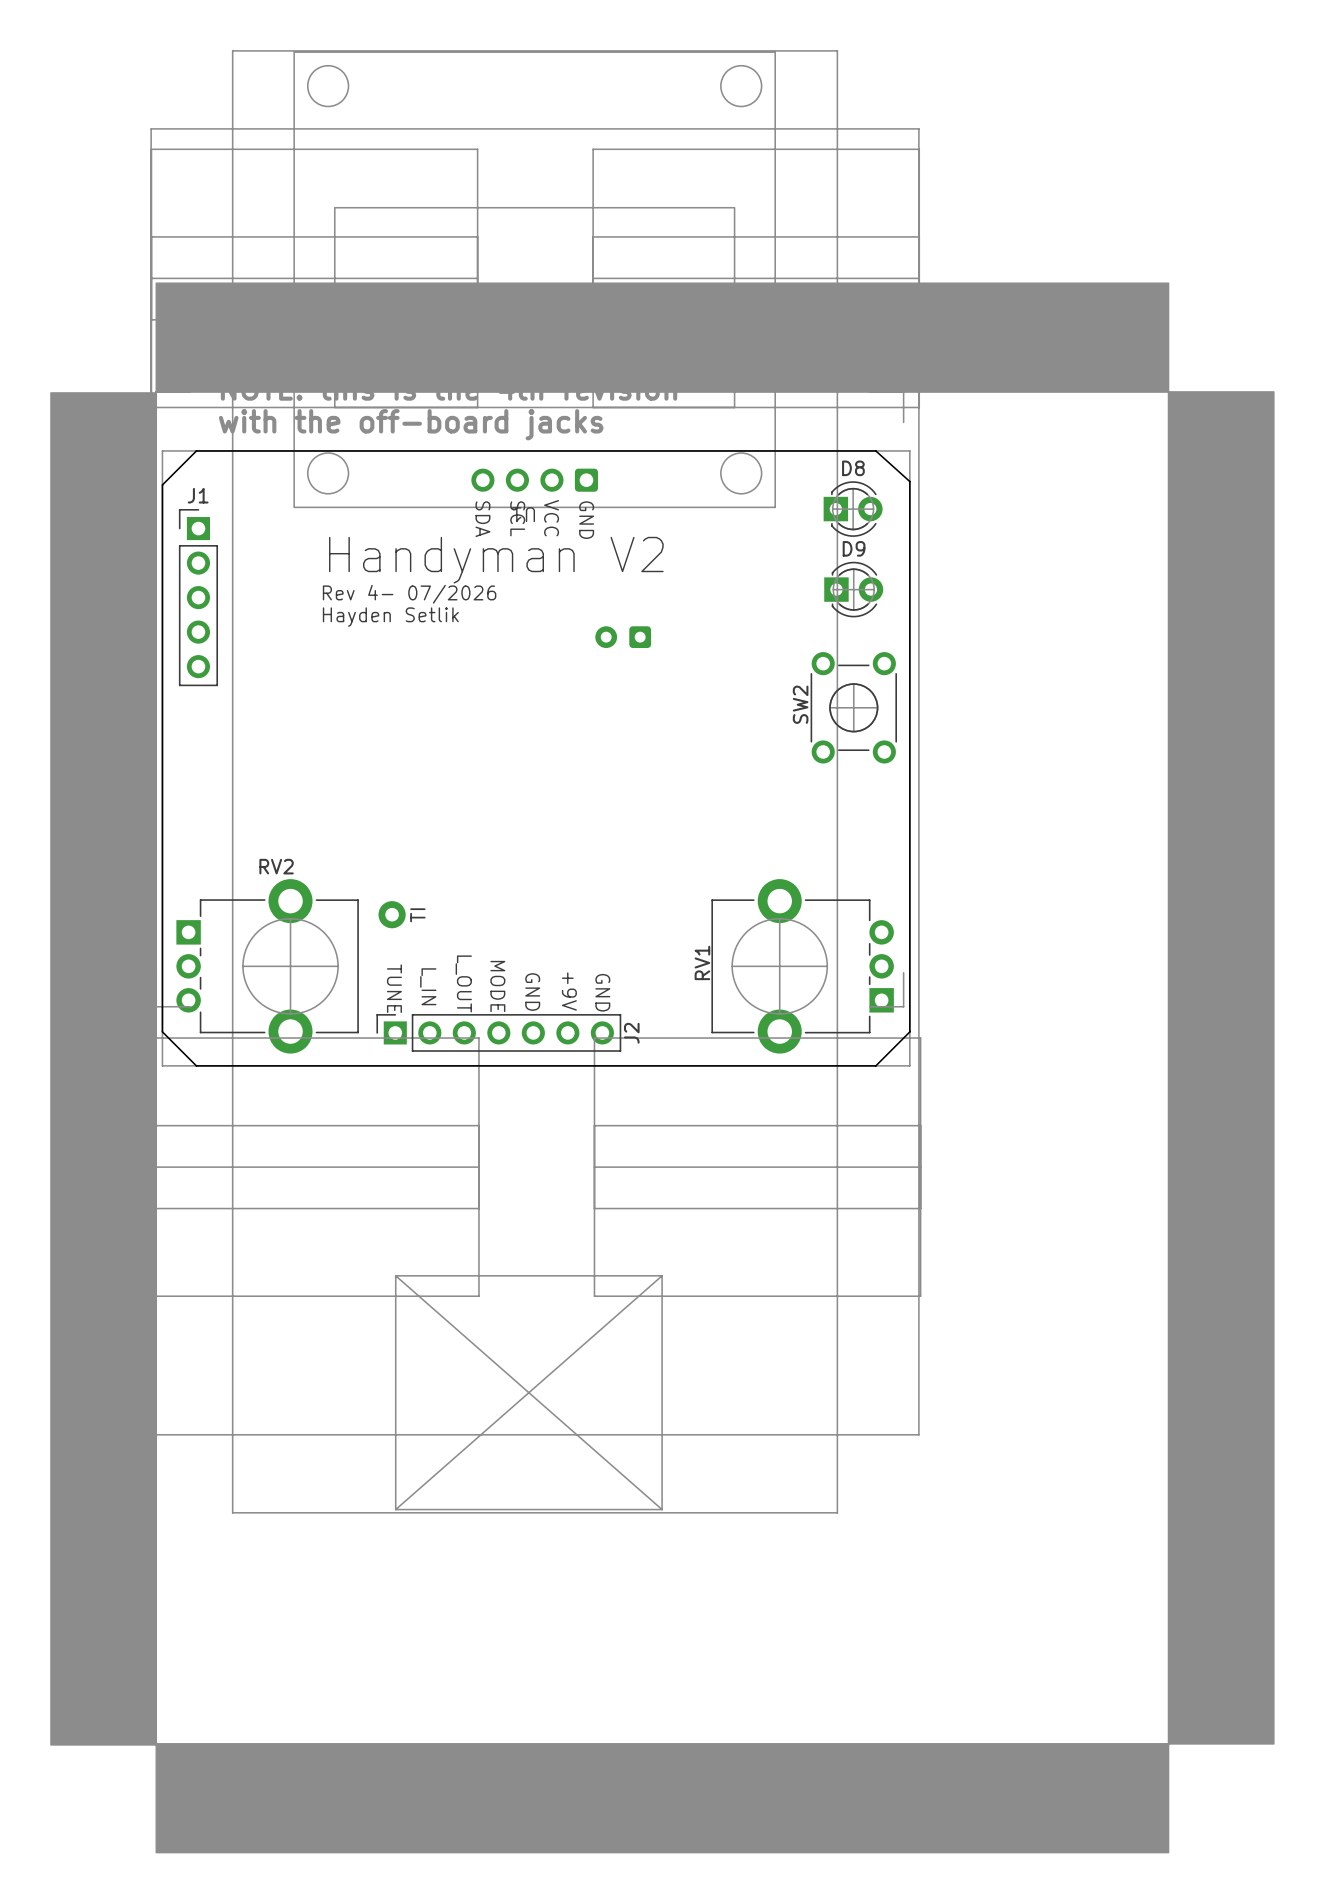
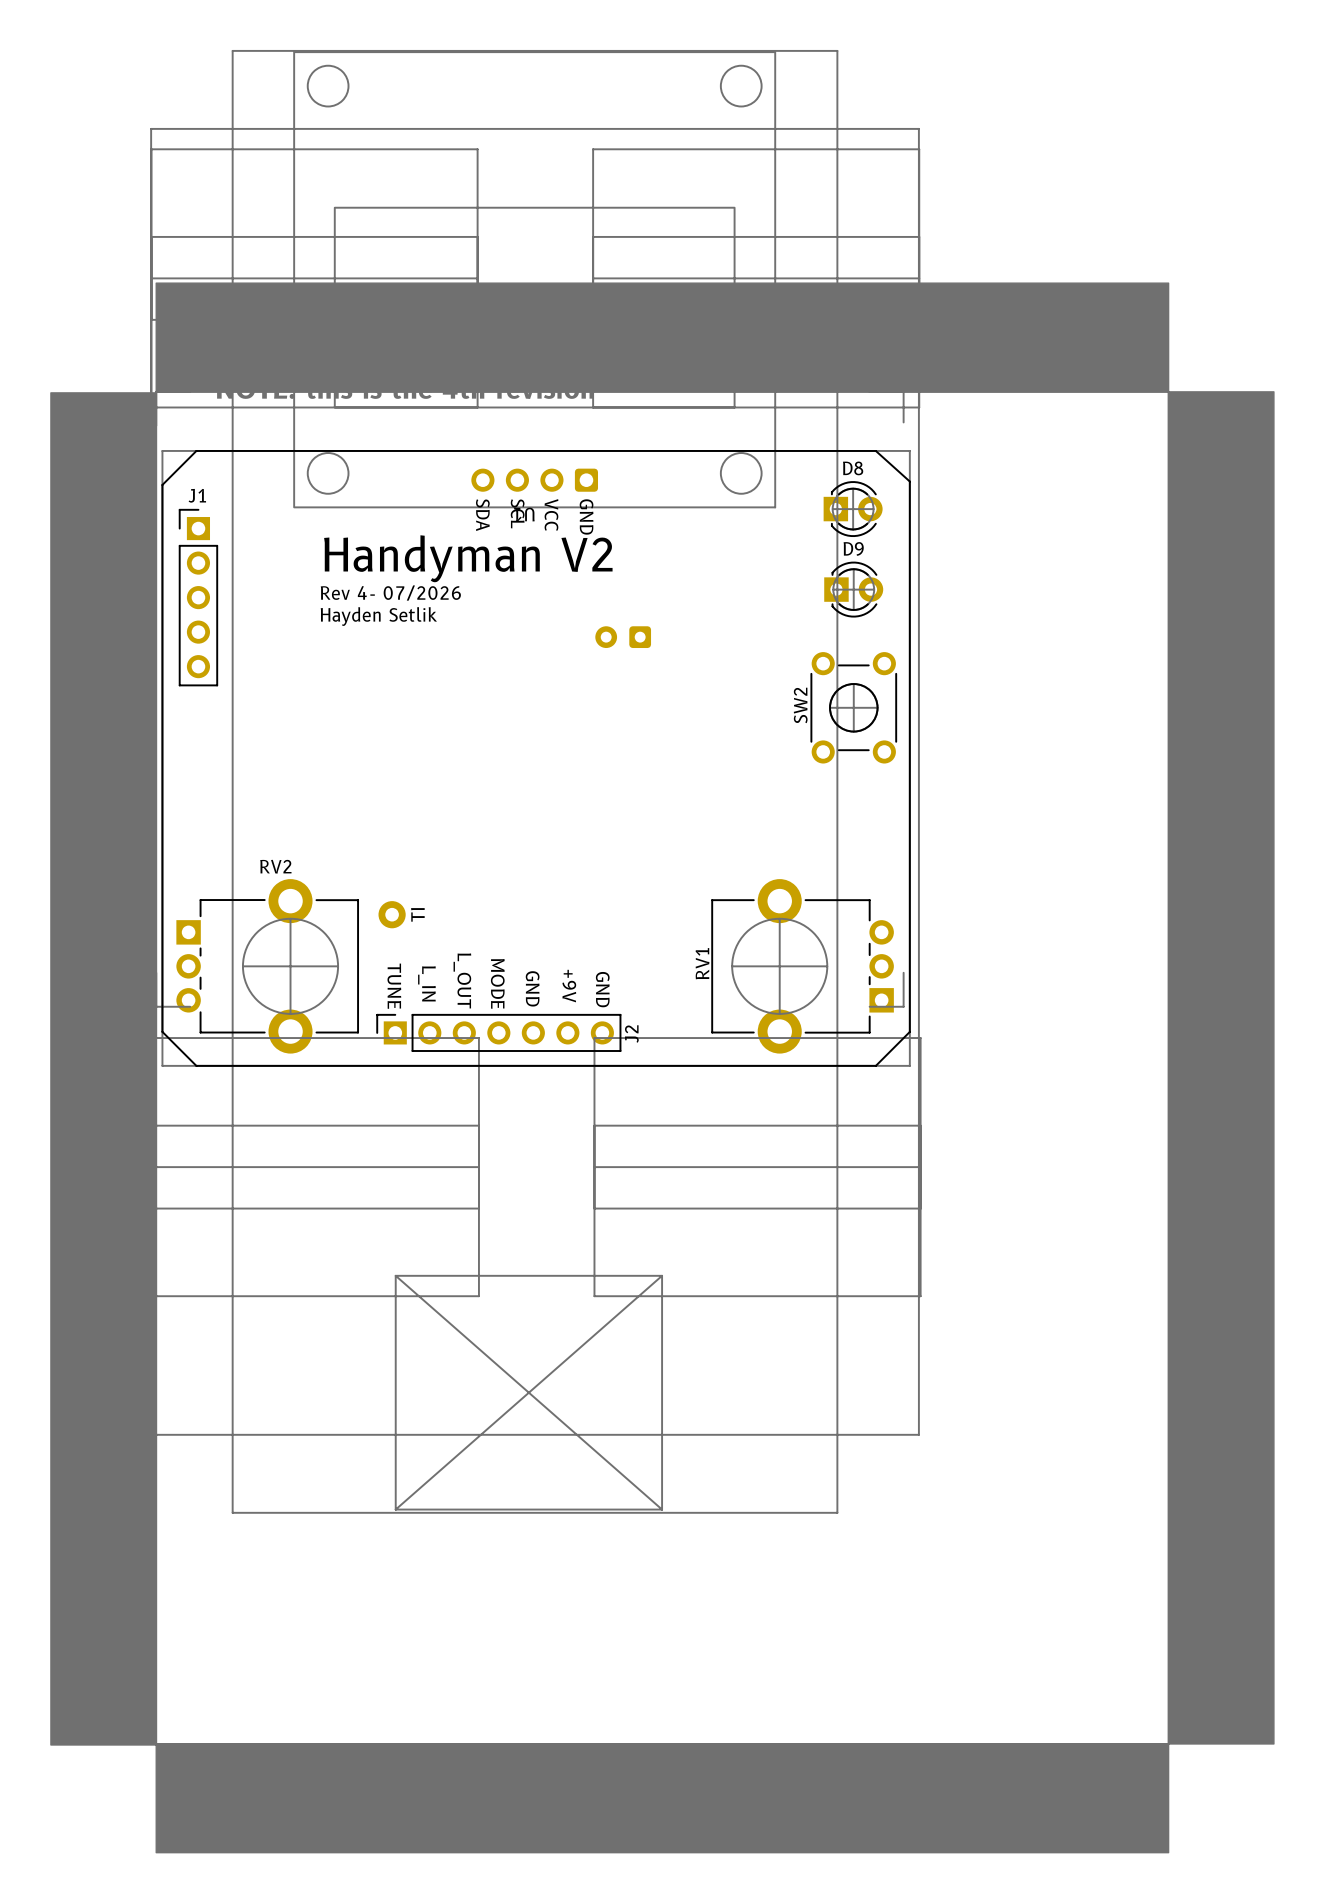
text: with the off-board jacks (411, 424) -> none

